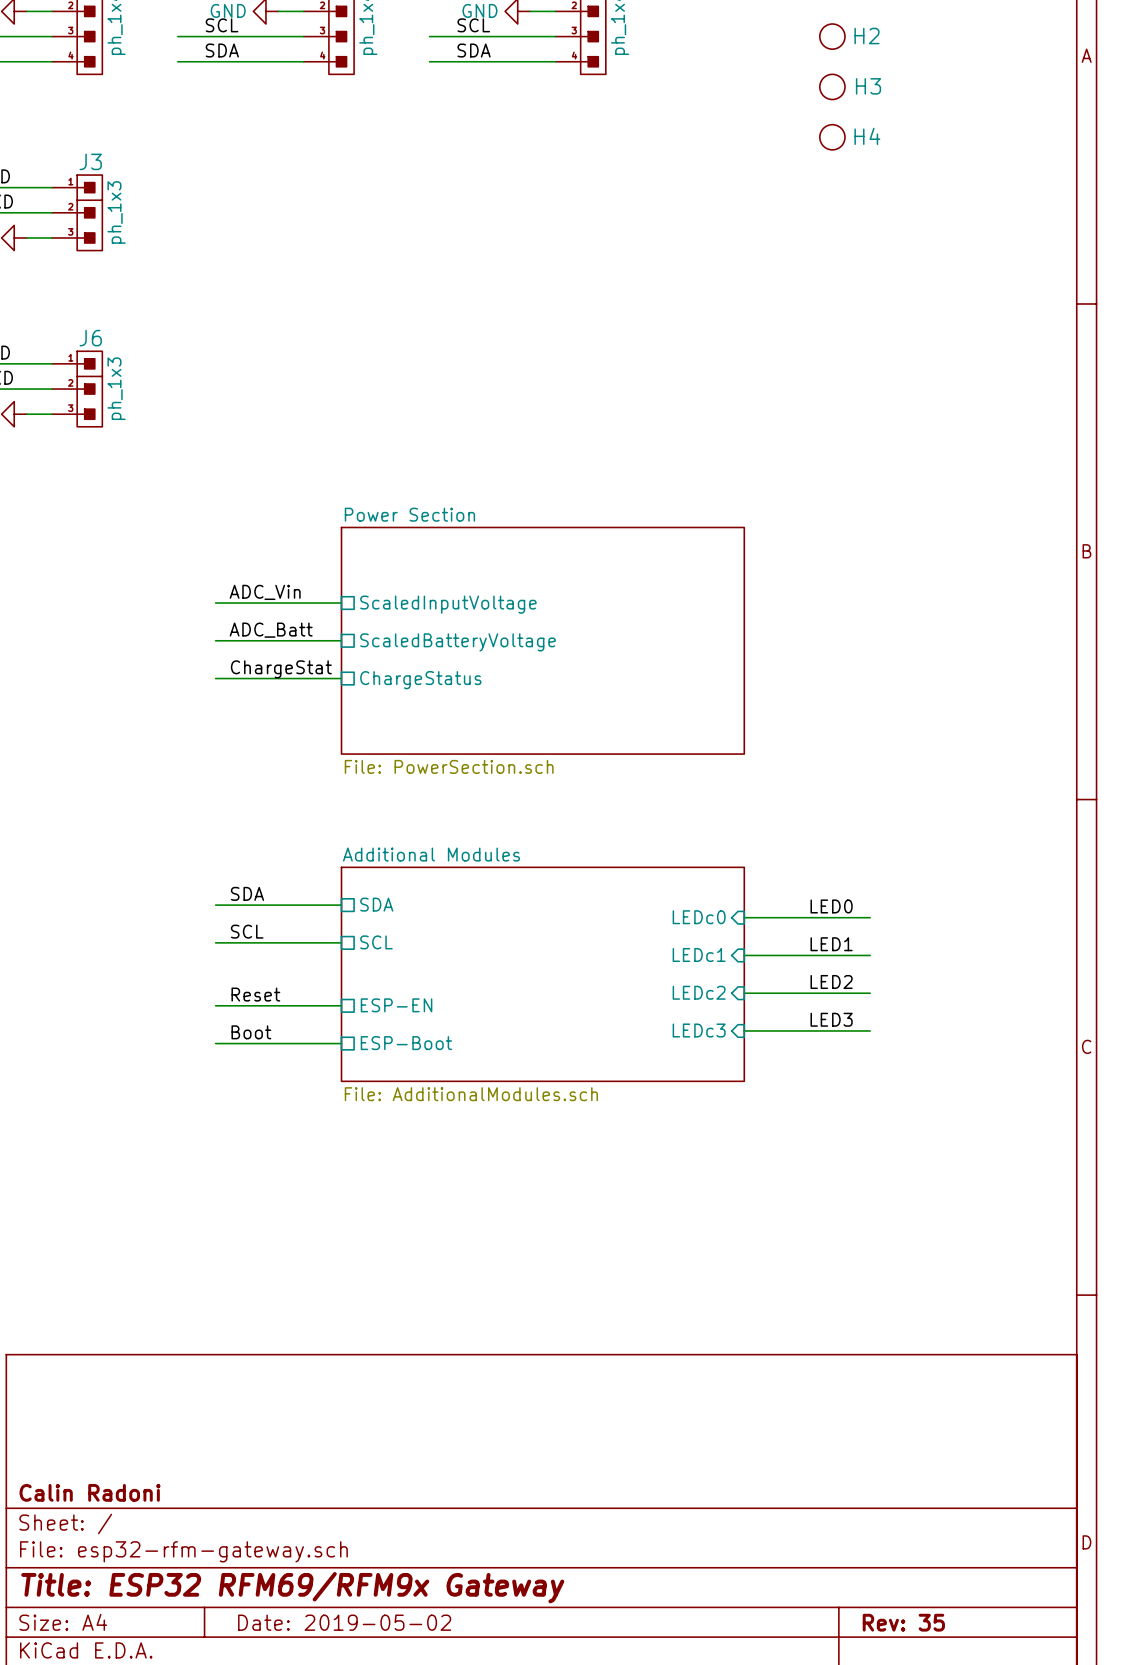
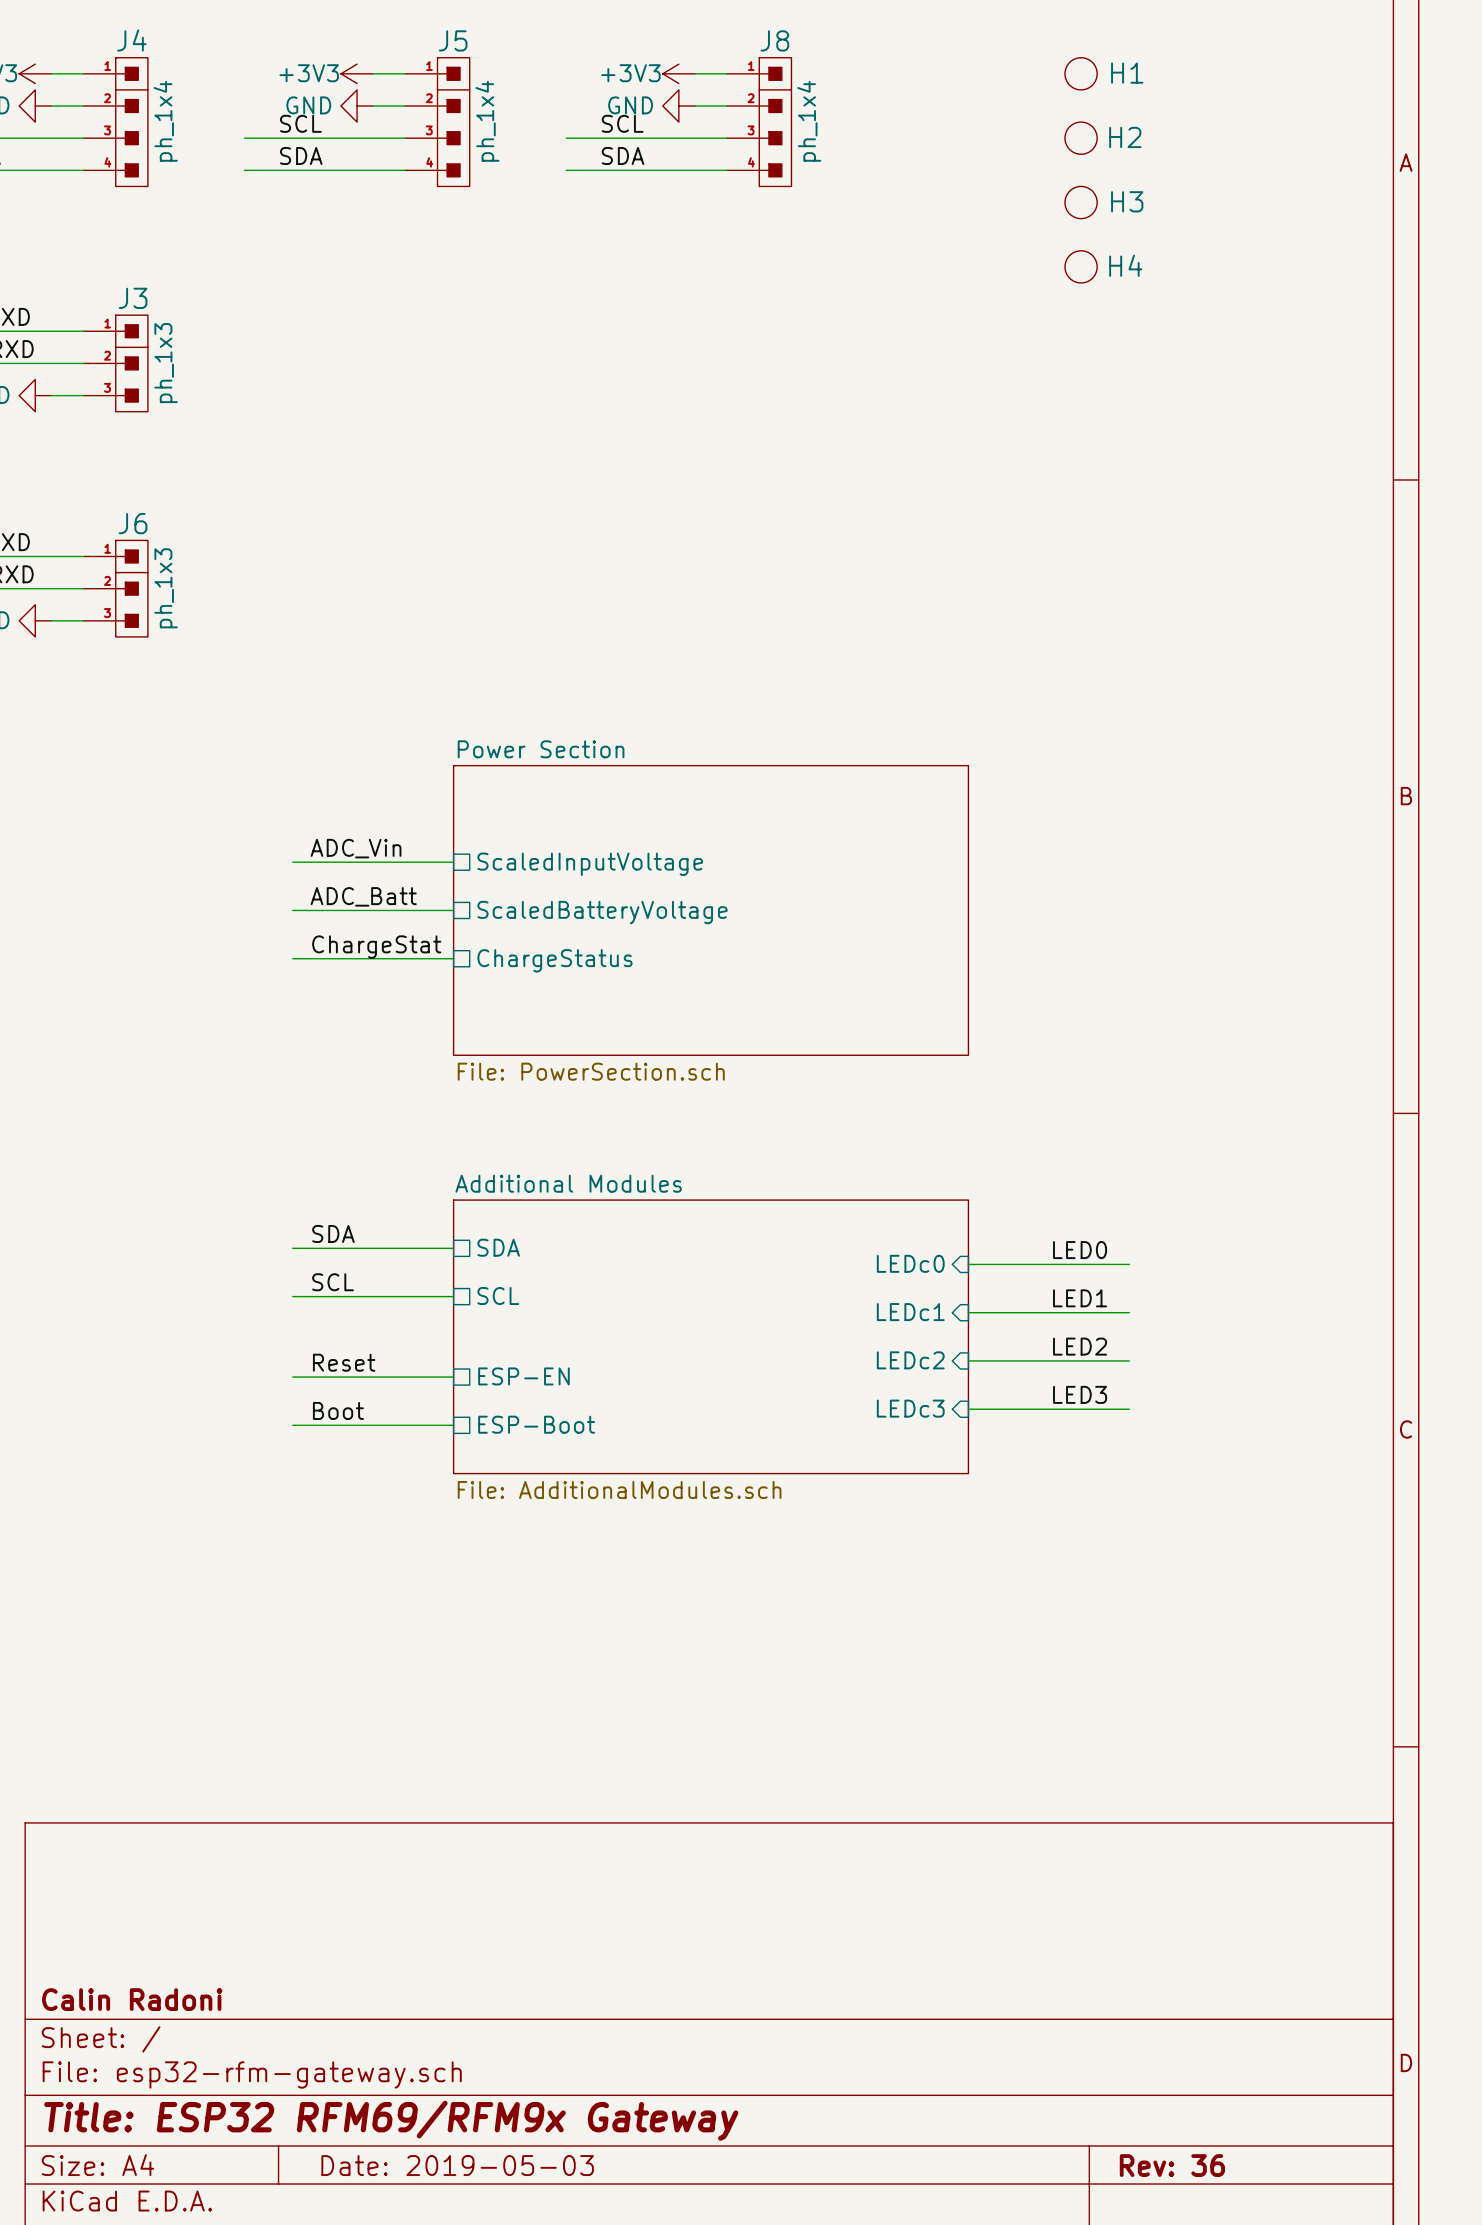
title block: Date: 2019-05-02 (344, 1622) -> Date: 2019-05-03 (457, 2165)
title block: Rev: 35 (903, 1622) -> Rev: 36 (1172, 2165)

